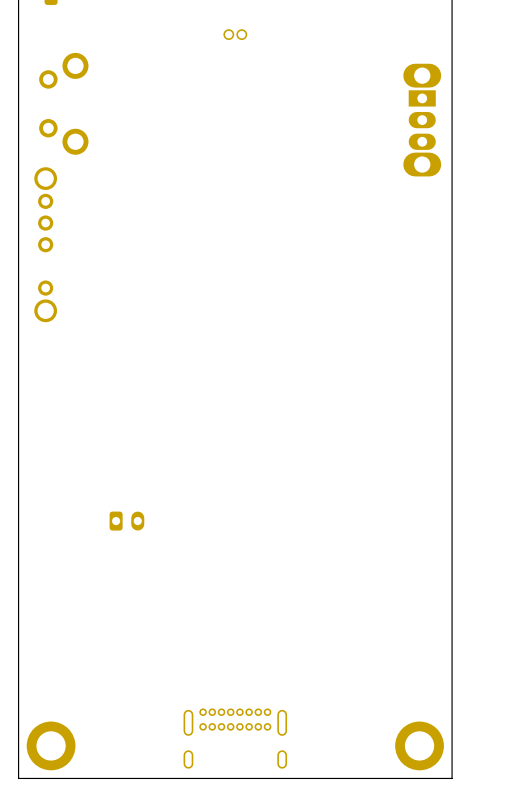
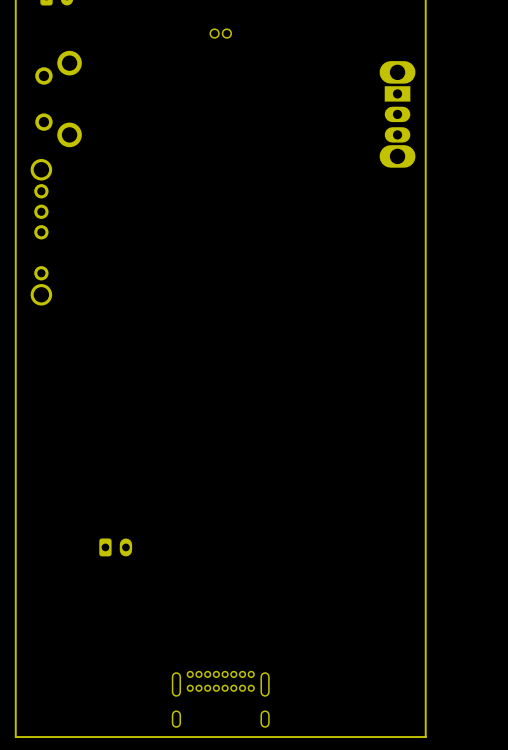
part position: (126, 521) -> (115, 547)
part: (51, 745) -> none
part: (419, 745) -> none

